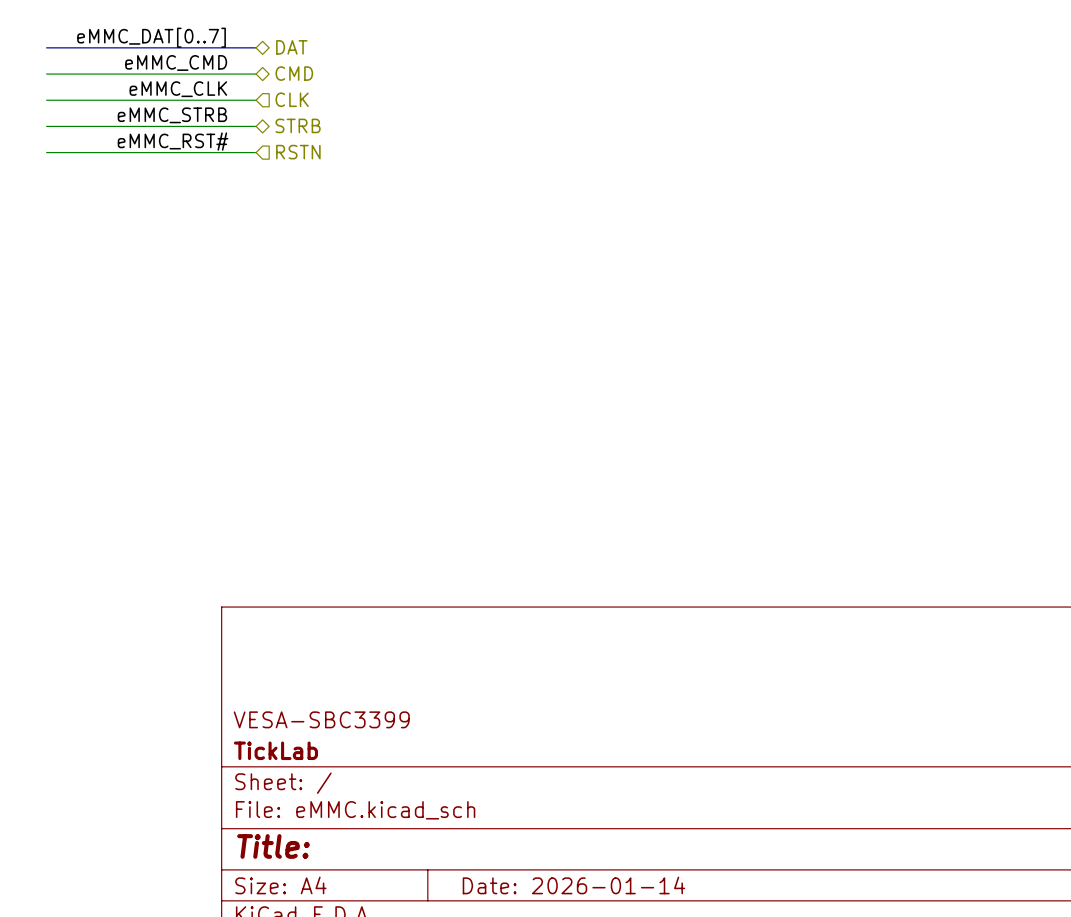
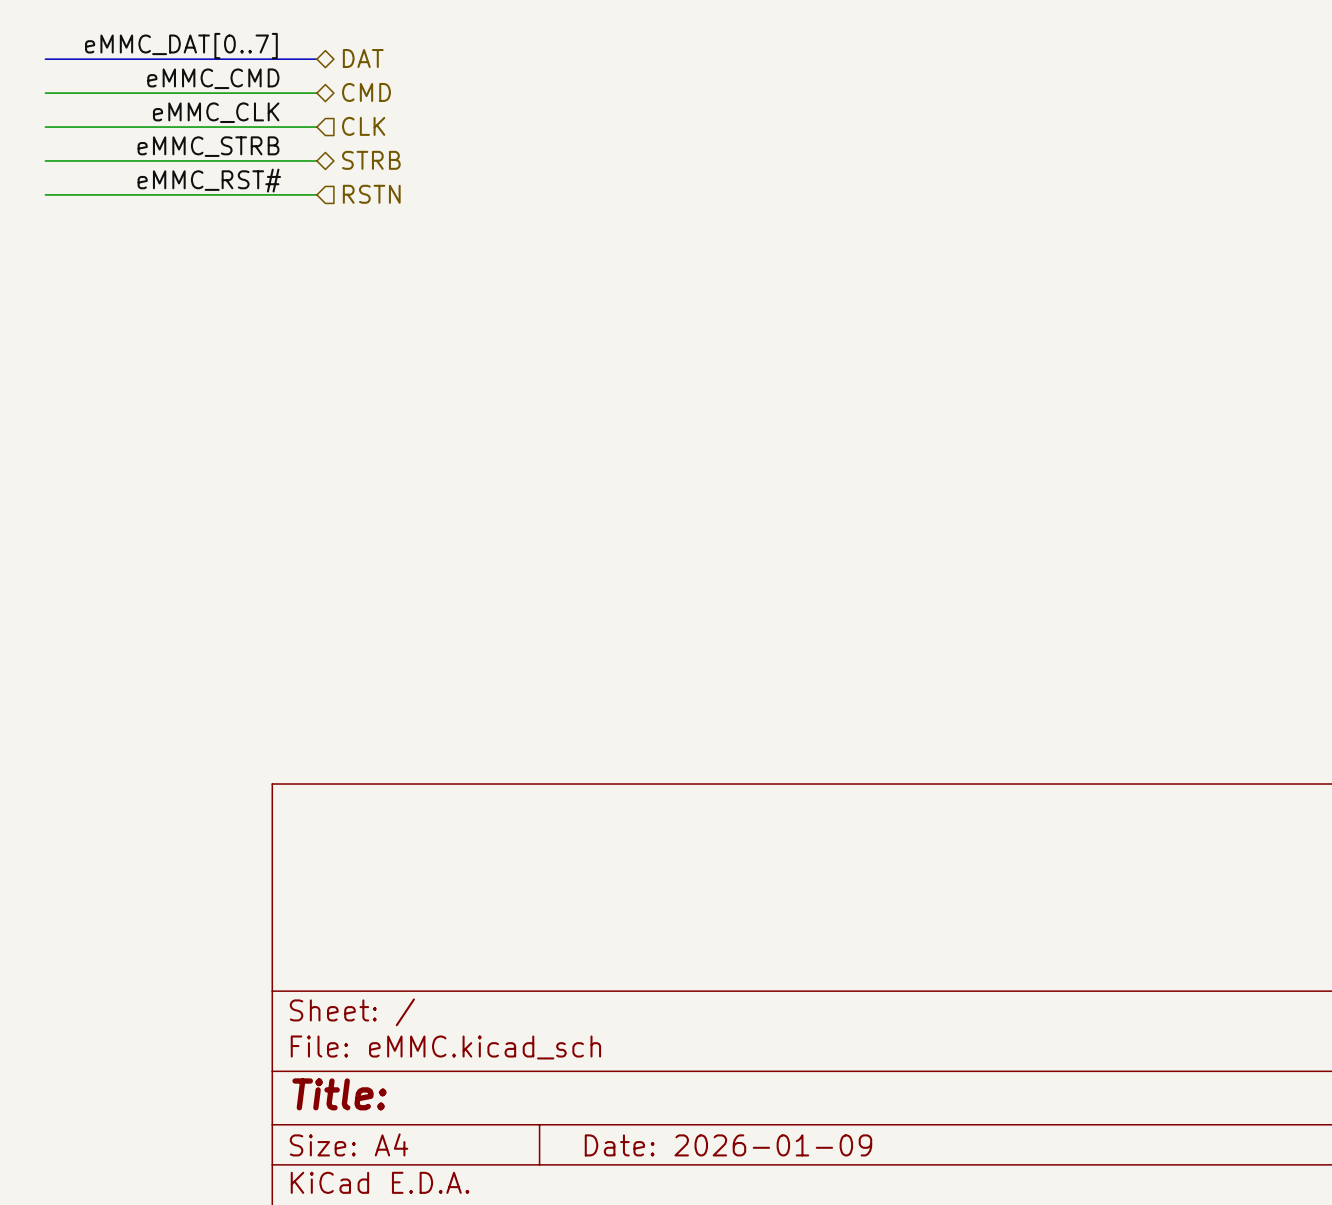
title block: VESA-SBC3399 (321, 719) -> none
title block: TickLab (275, 750) -> none
title block: Date: 2026-01-14 (573, 885) -> Date: 2026-01-09 (728, 1145)

